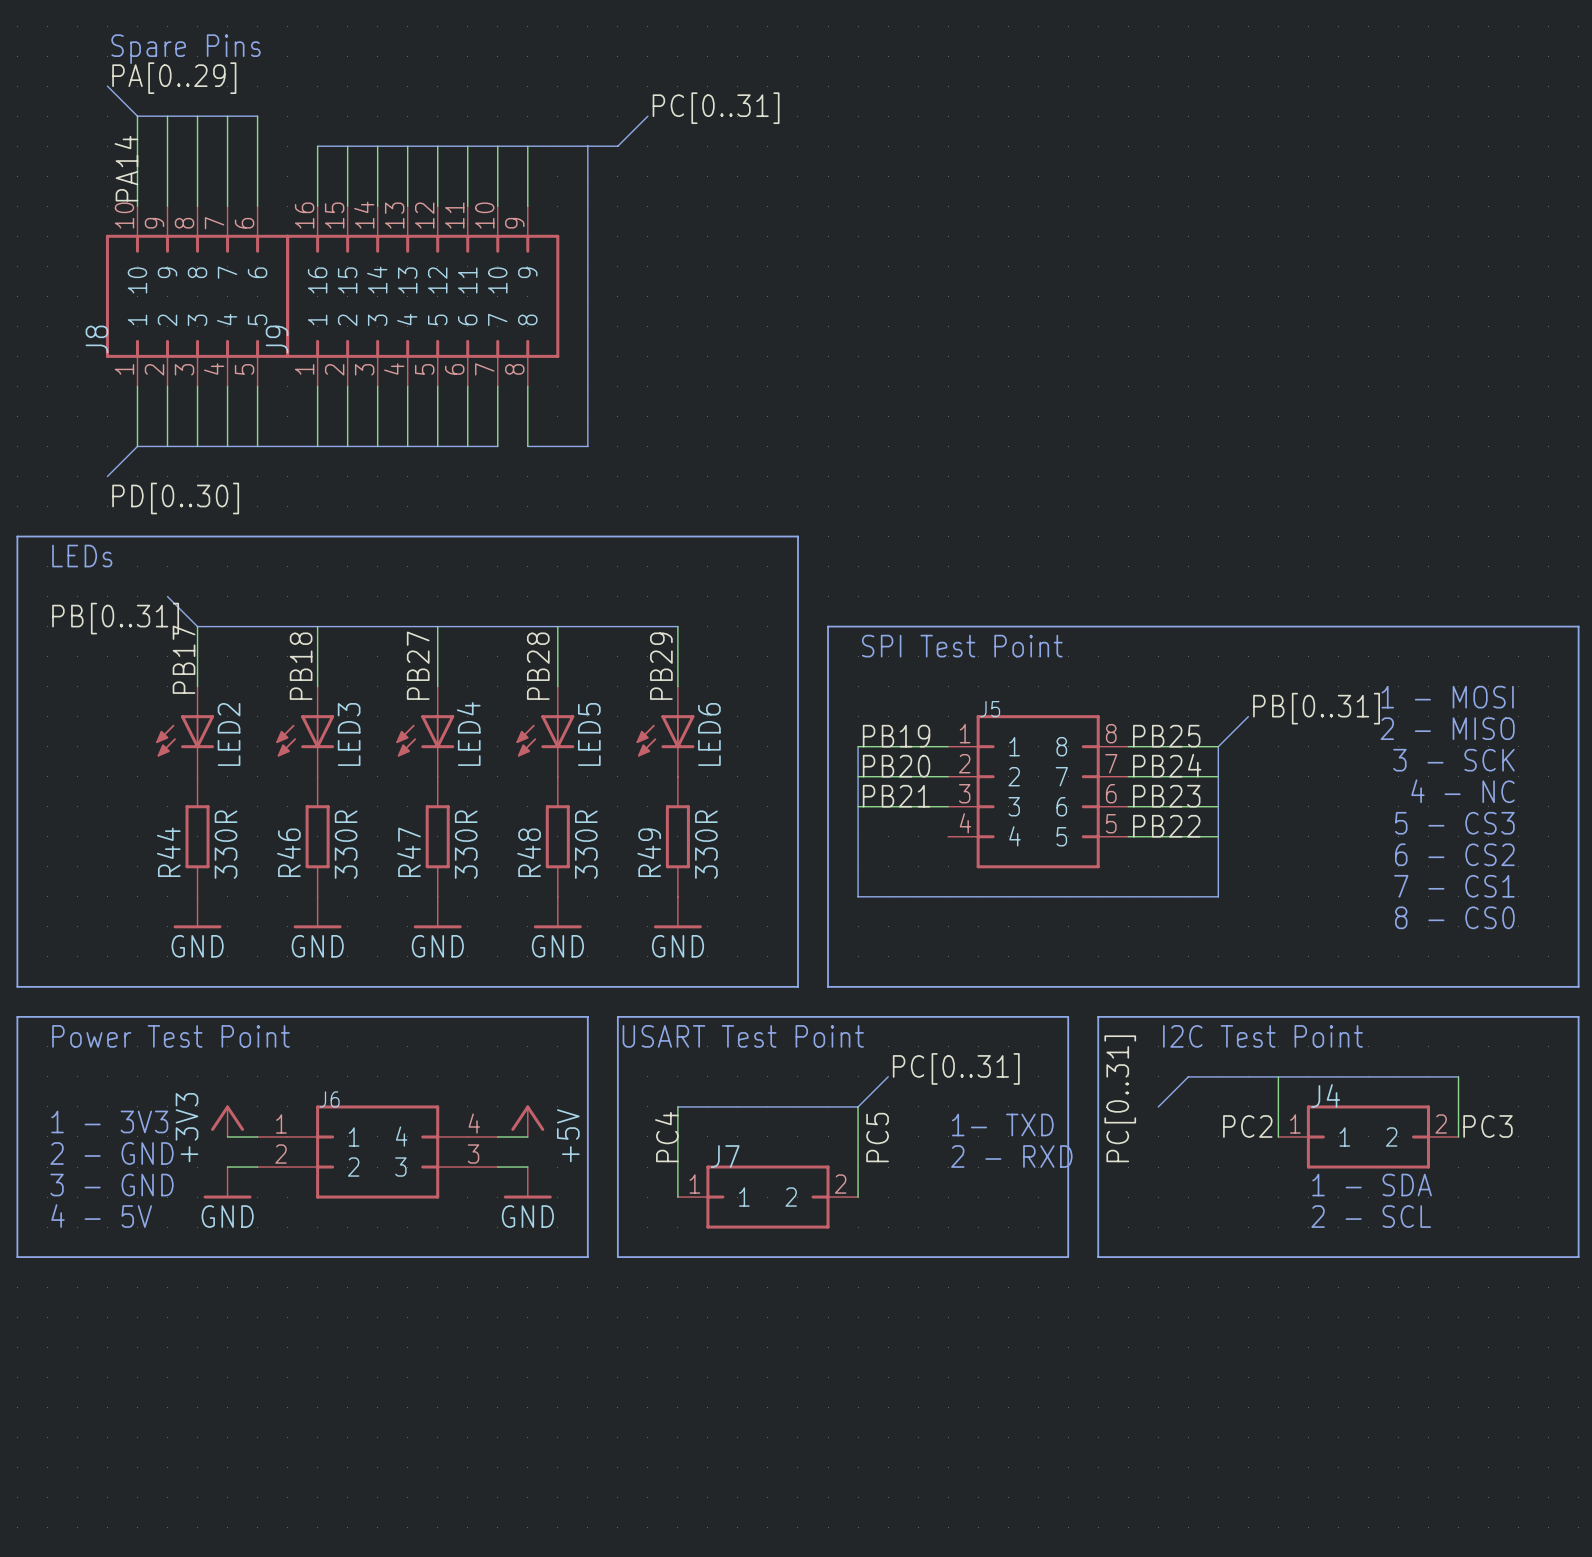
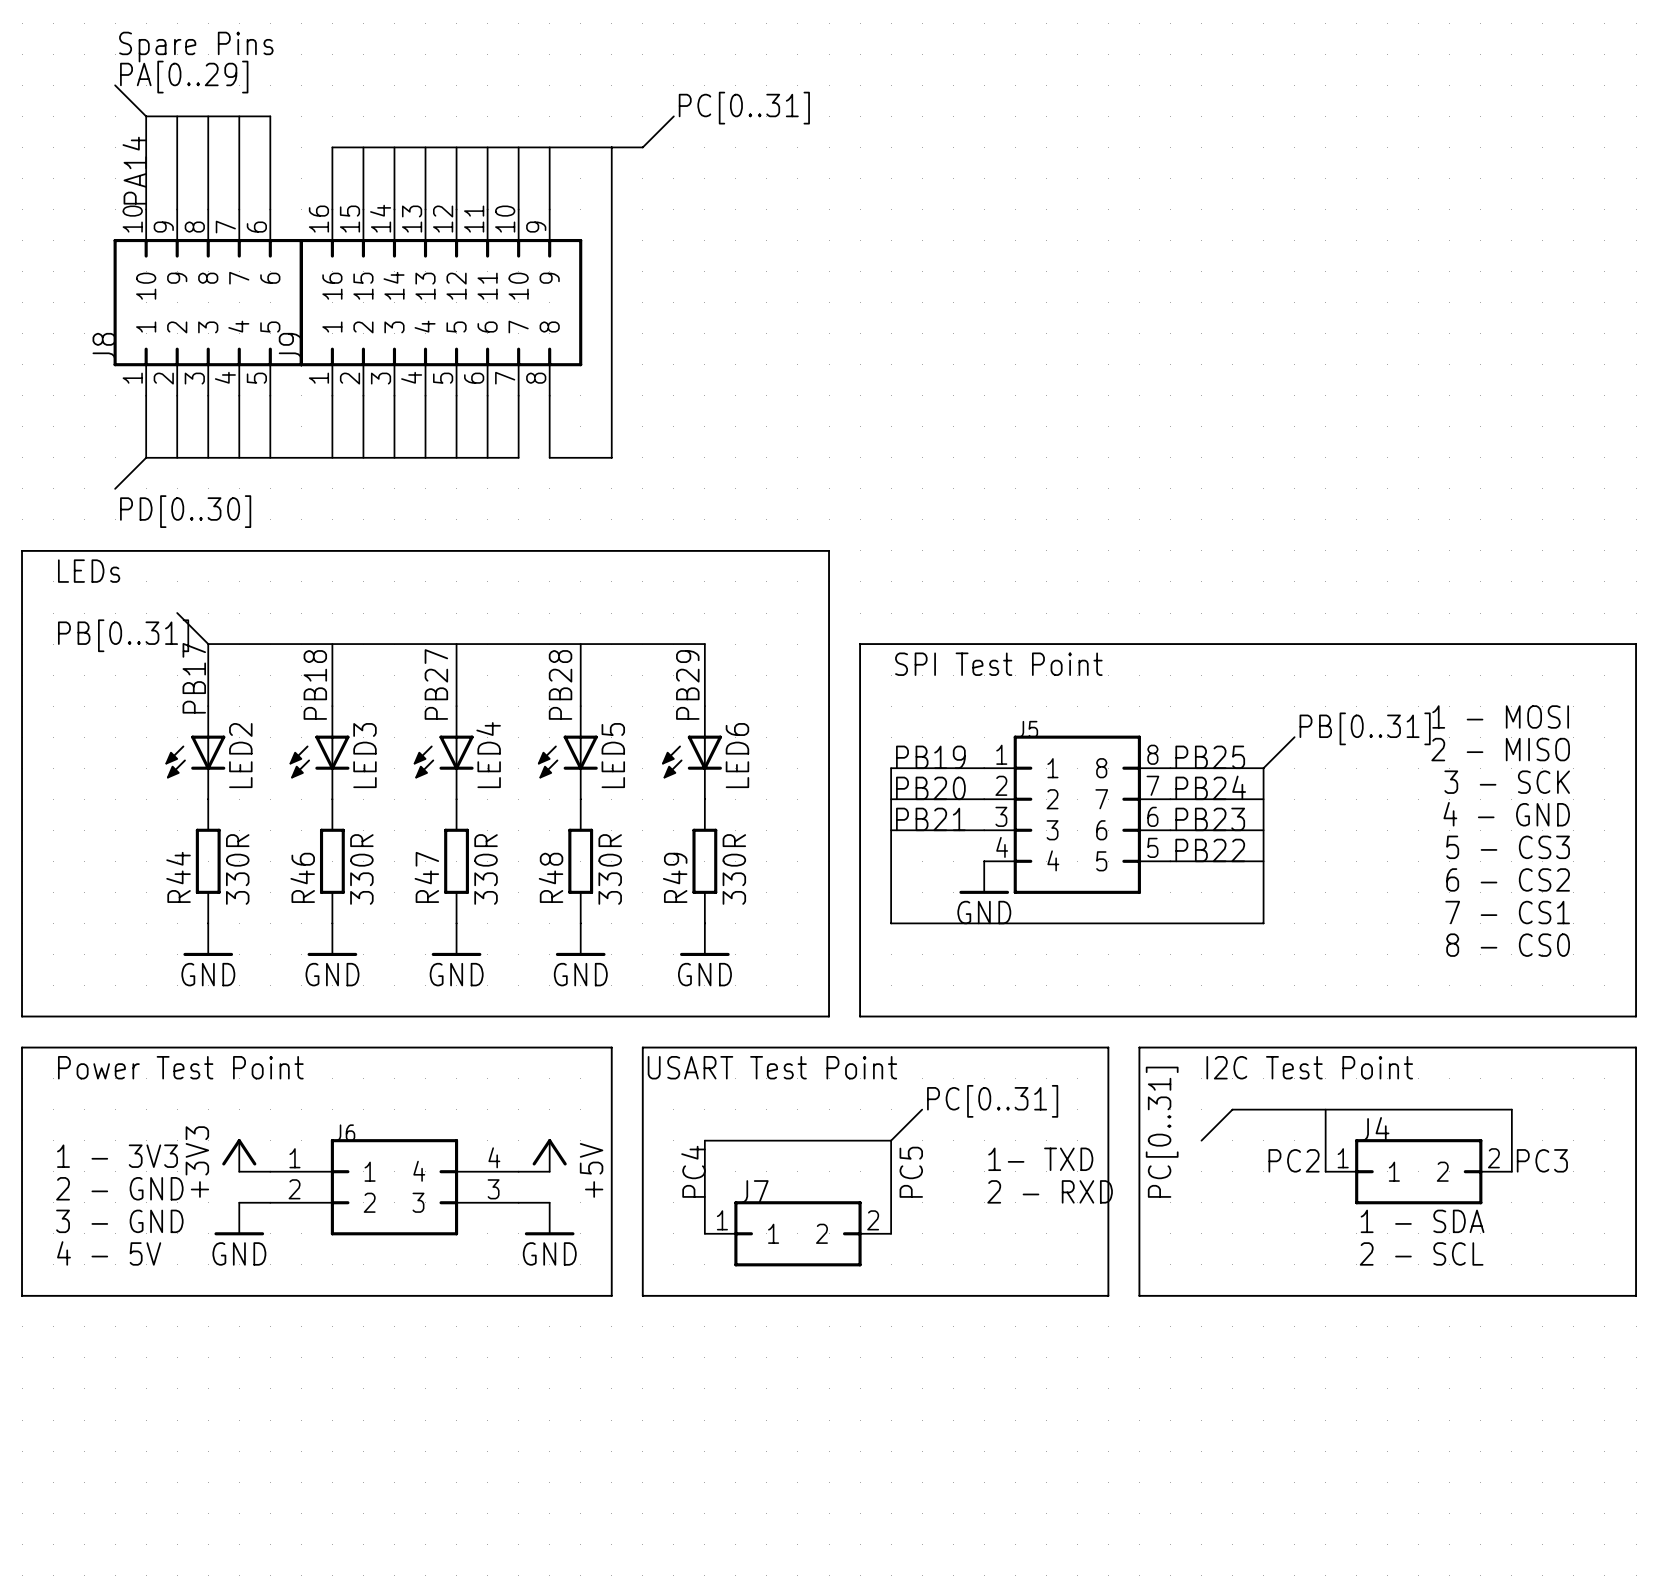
text: 4 - NC (1462, 791) -> 4 - GND (1506, 814)
power symbol: none -> GND (984, 877)

